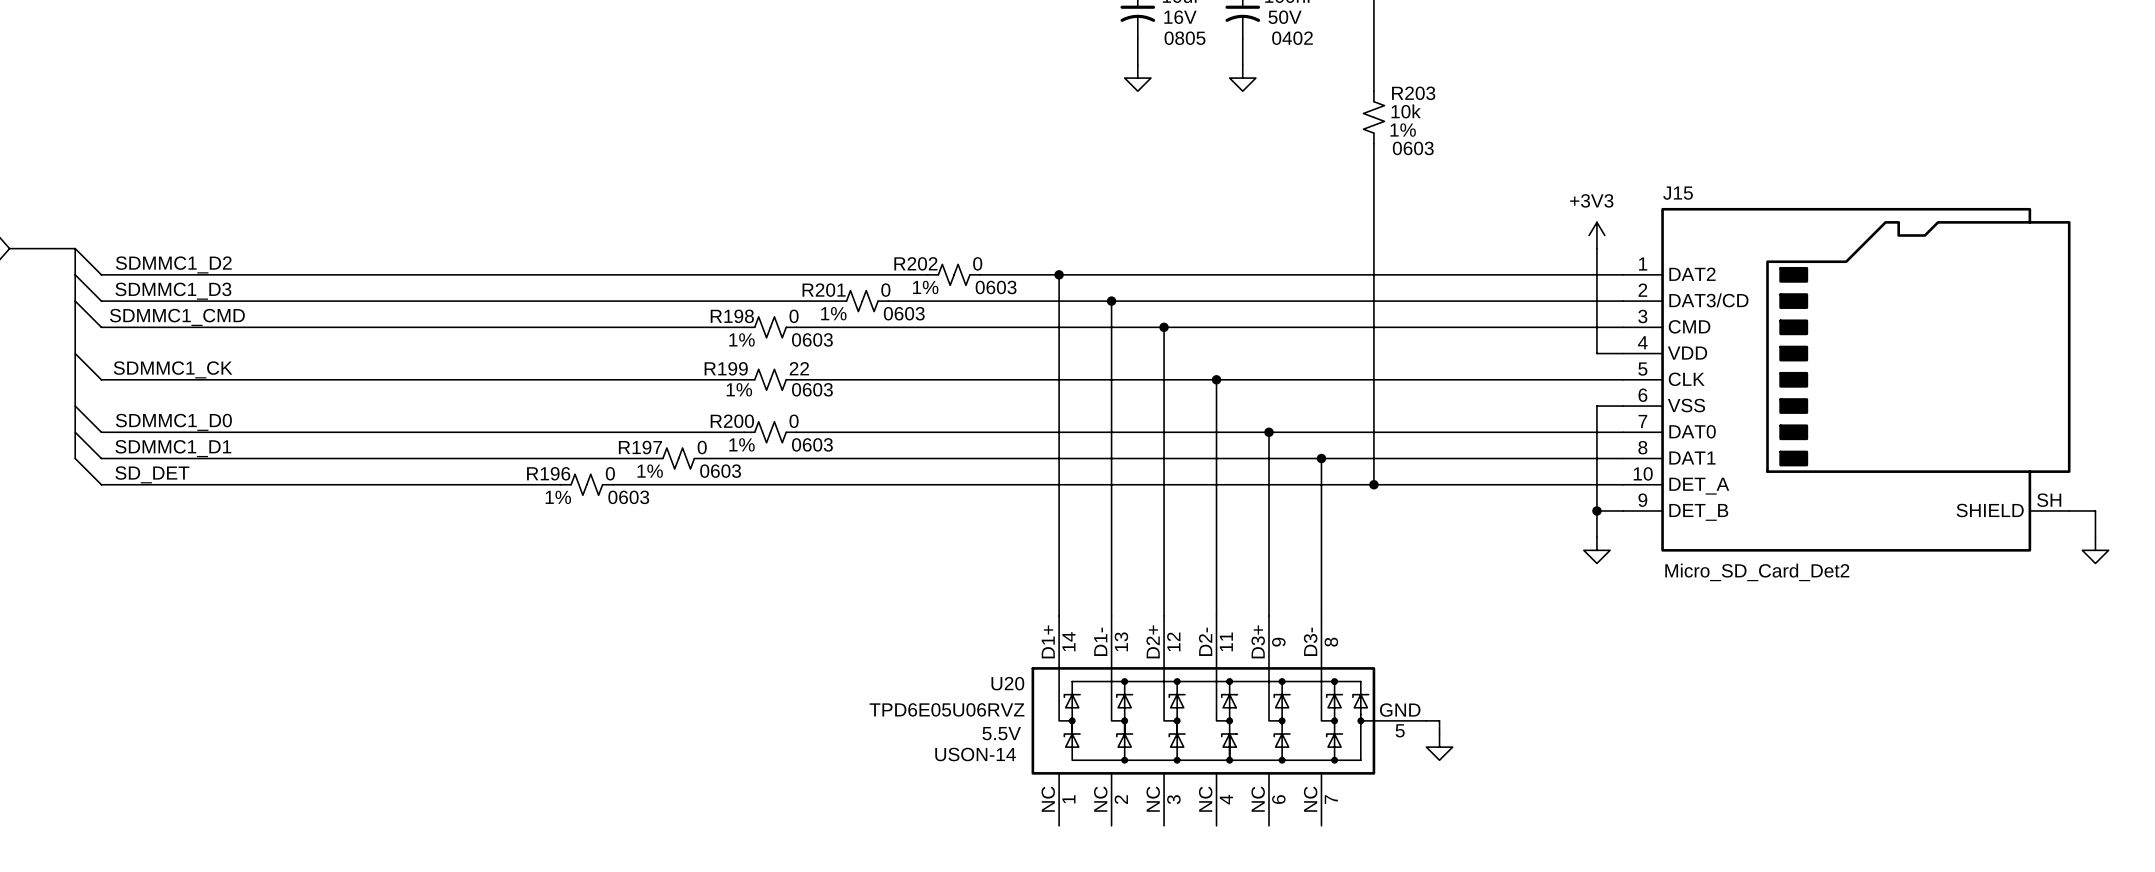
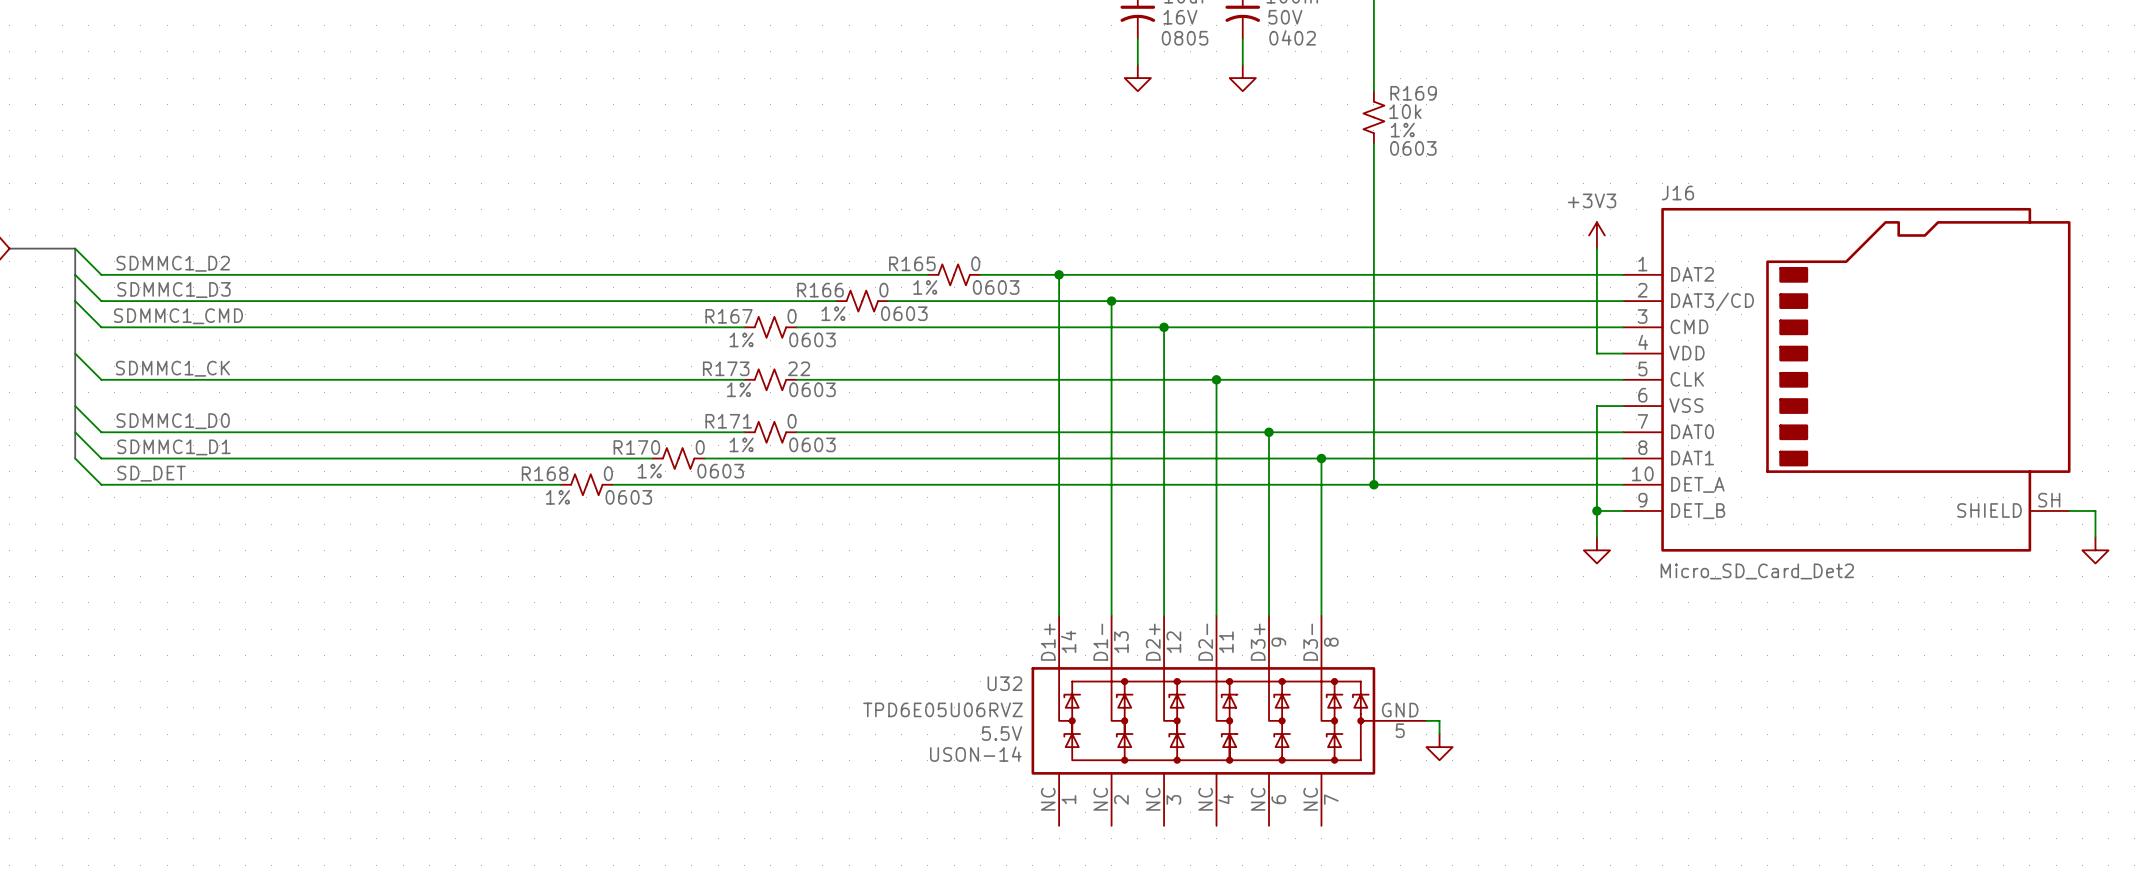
R203 name: R203 (1413, 93) -> R169 (1413, 93)
J15 name: J15 (1678, 193) -> J16 (1677, 193)
R202 name: R202 (915, 263) -> R165 (912, 263)
R201 name: R201 (824, 290) -> R166 (820, 290)
R198 name: R198 (732, 316) -> R167 (729, 316)
R199 name: R199 (726, 368) -> R173 (726, 368)
R200 name: R200 (732, 421) -> R171 (728, 421)
R197 name: R197 (640, 447) -> R170 (636, 447)
R196 name: R196 (548, 473) -> R168 (545, 473)
U20 name: U20 (1007, 683) -> U32 (1004, 683)

